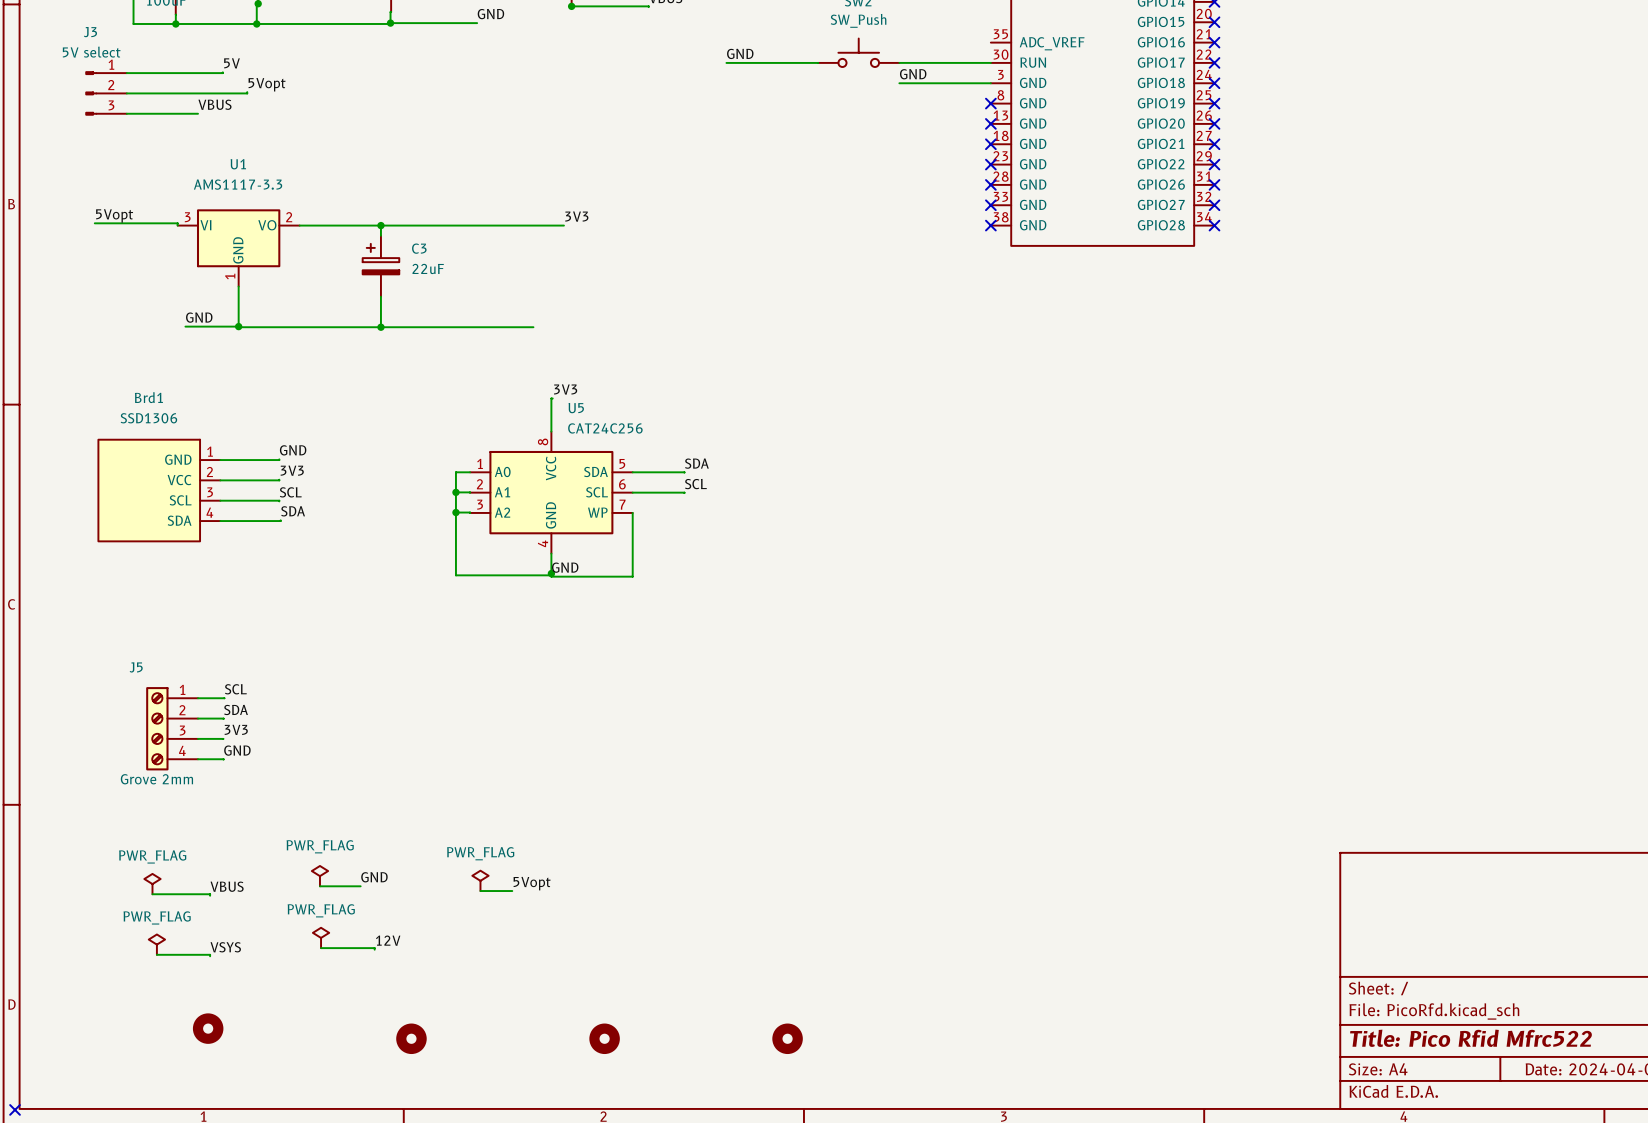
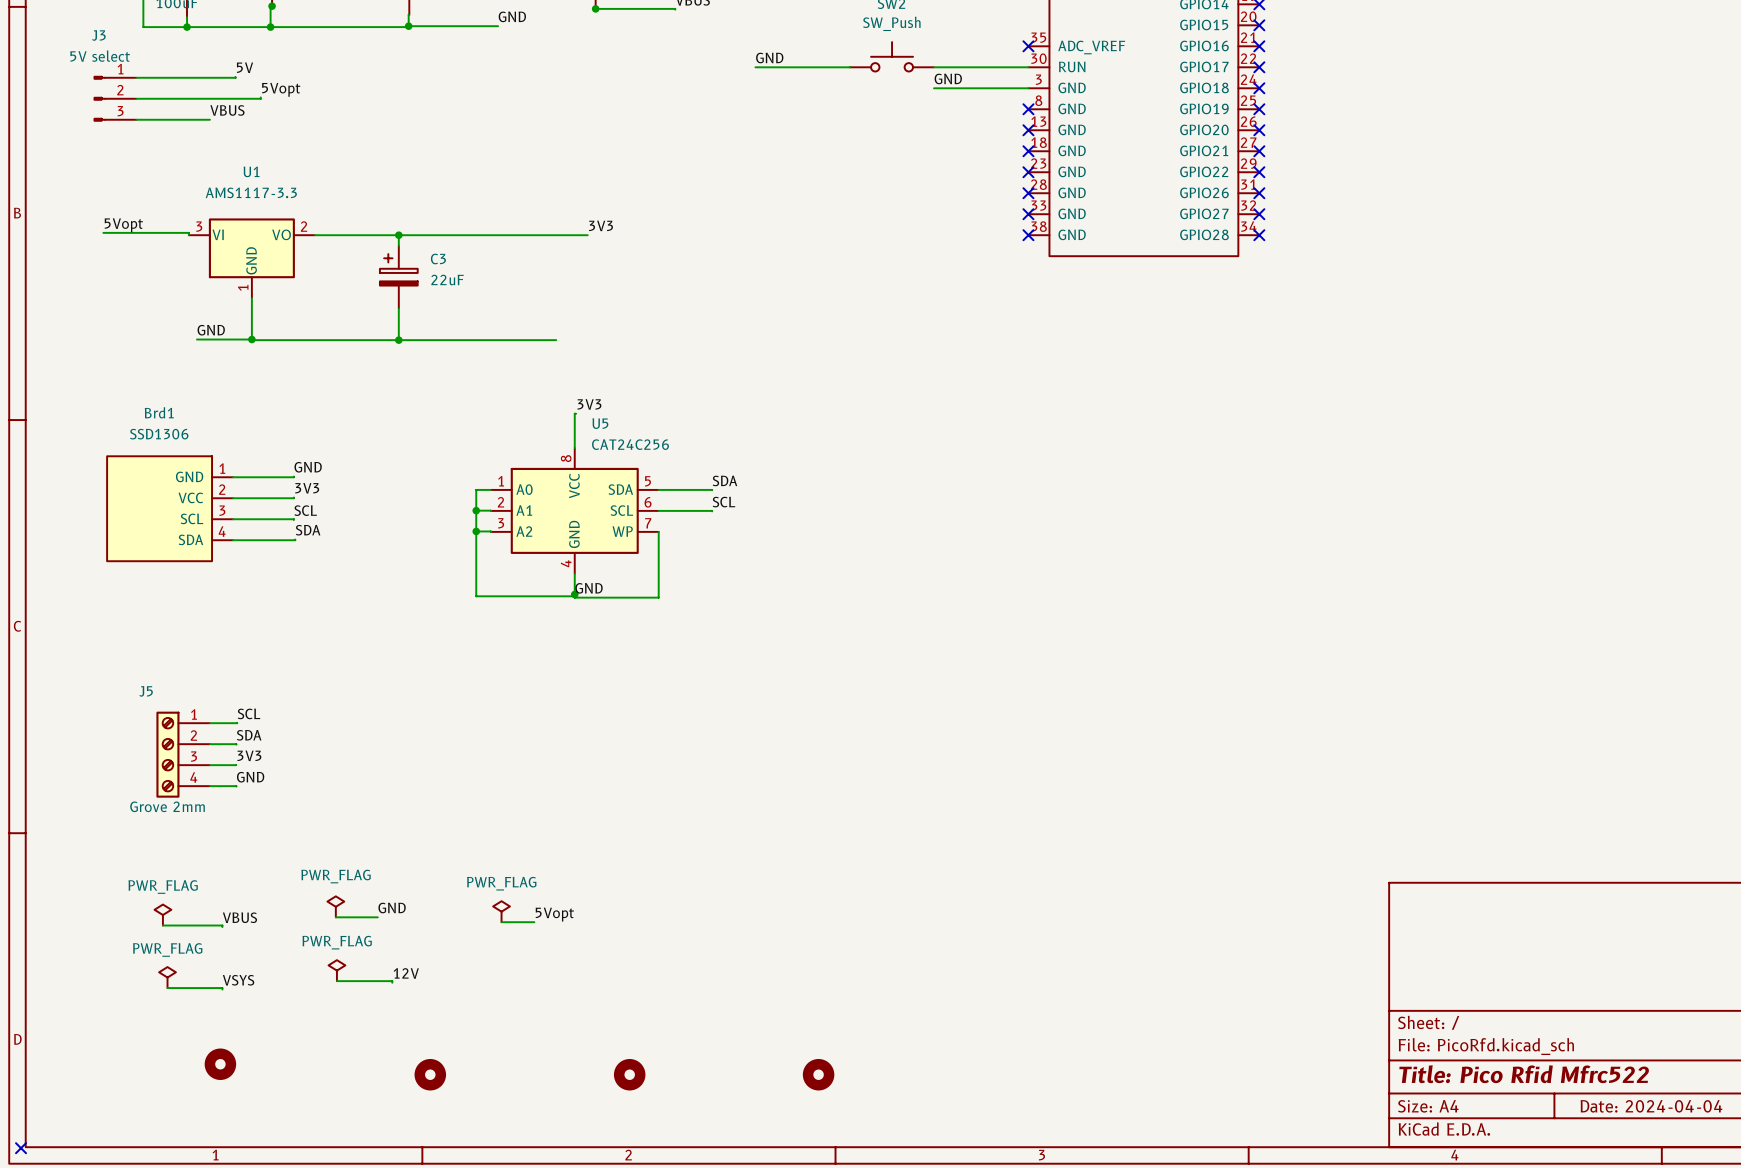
no-connect mark: none -> (1028, 46)

